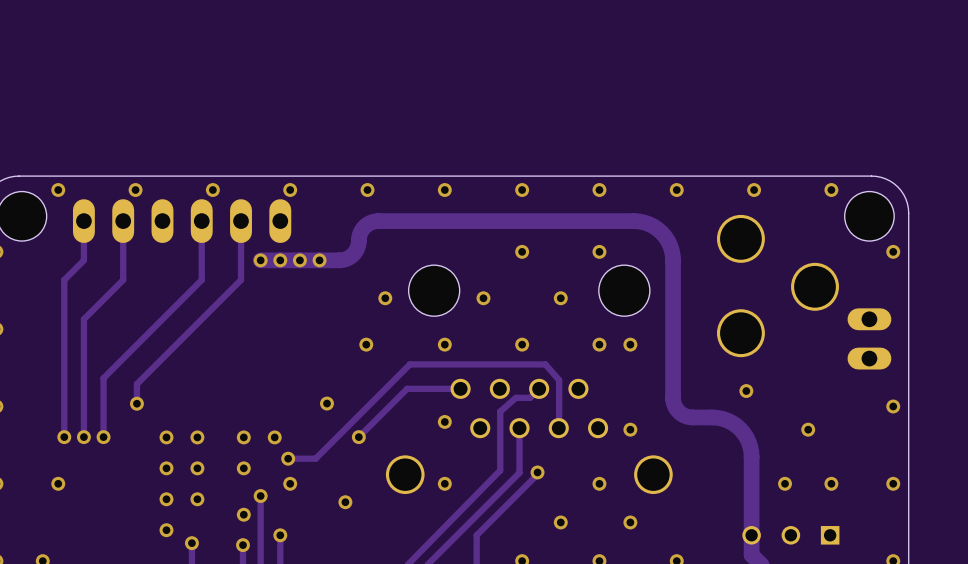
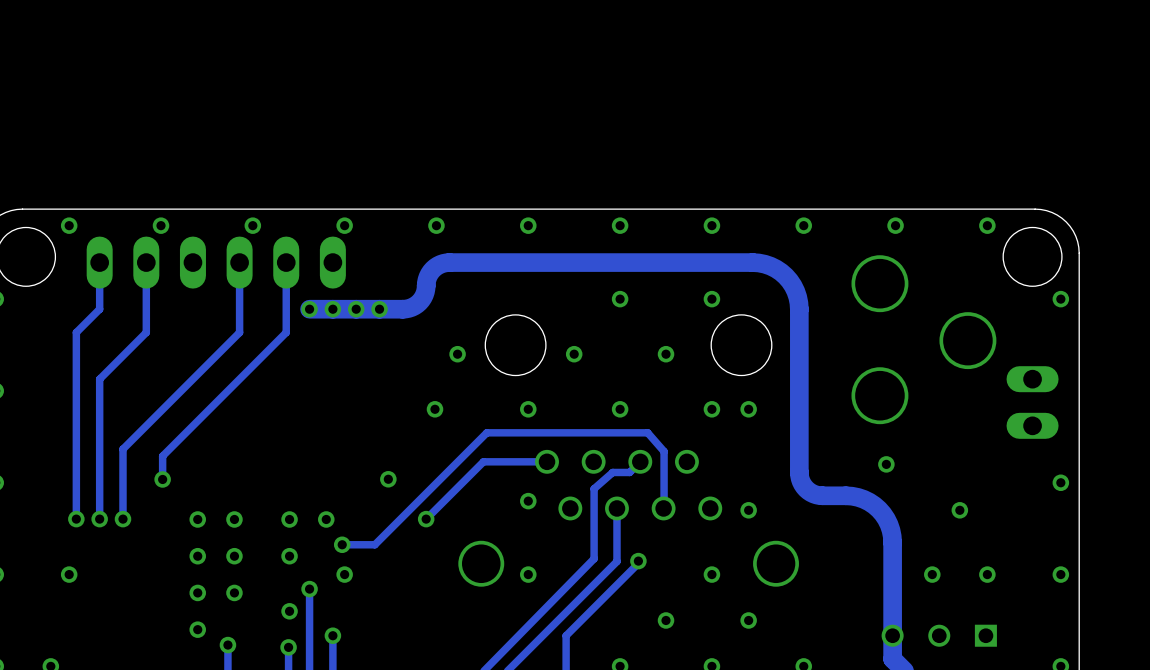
via: (345, 502) -> none

